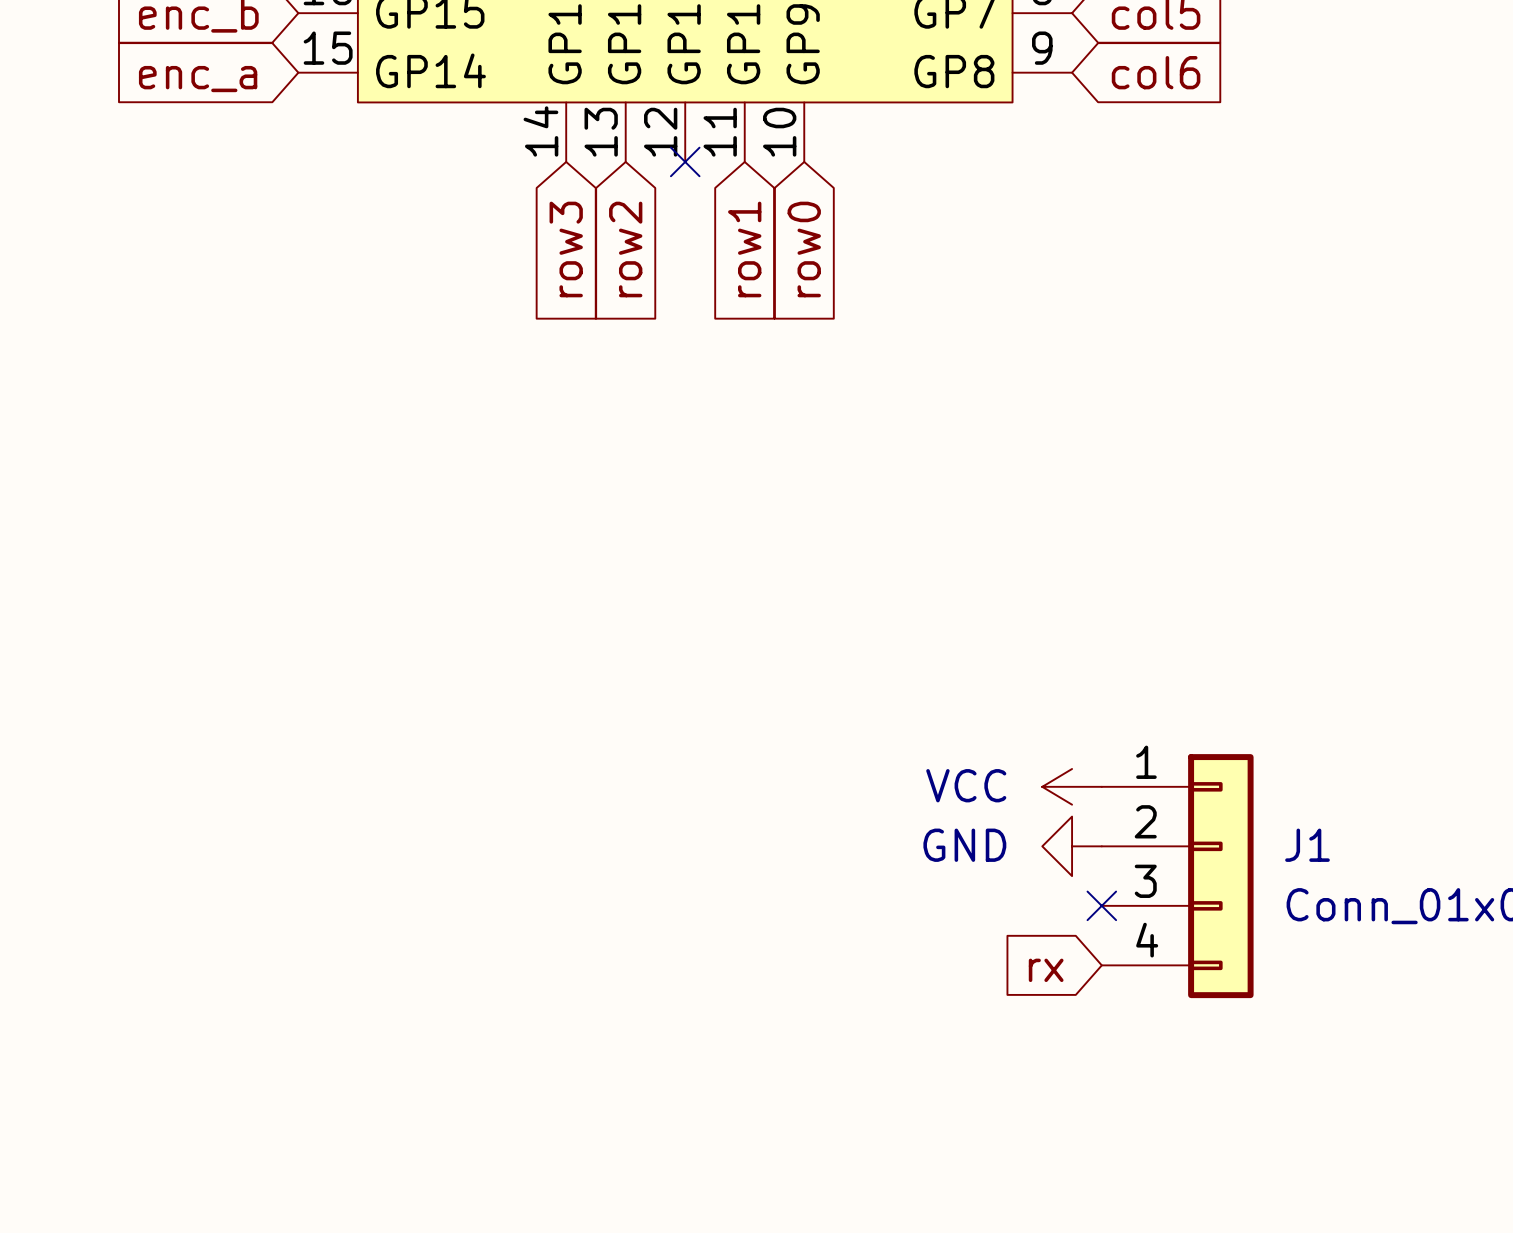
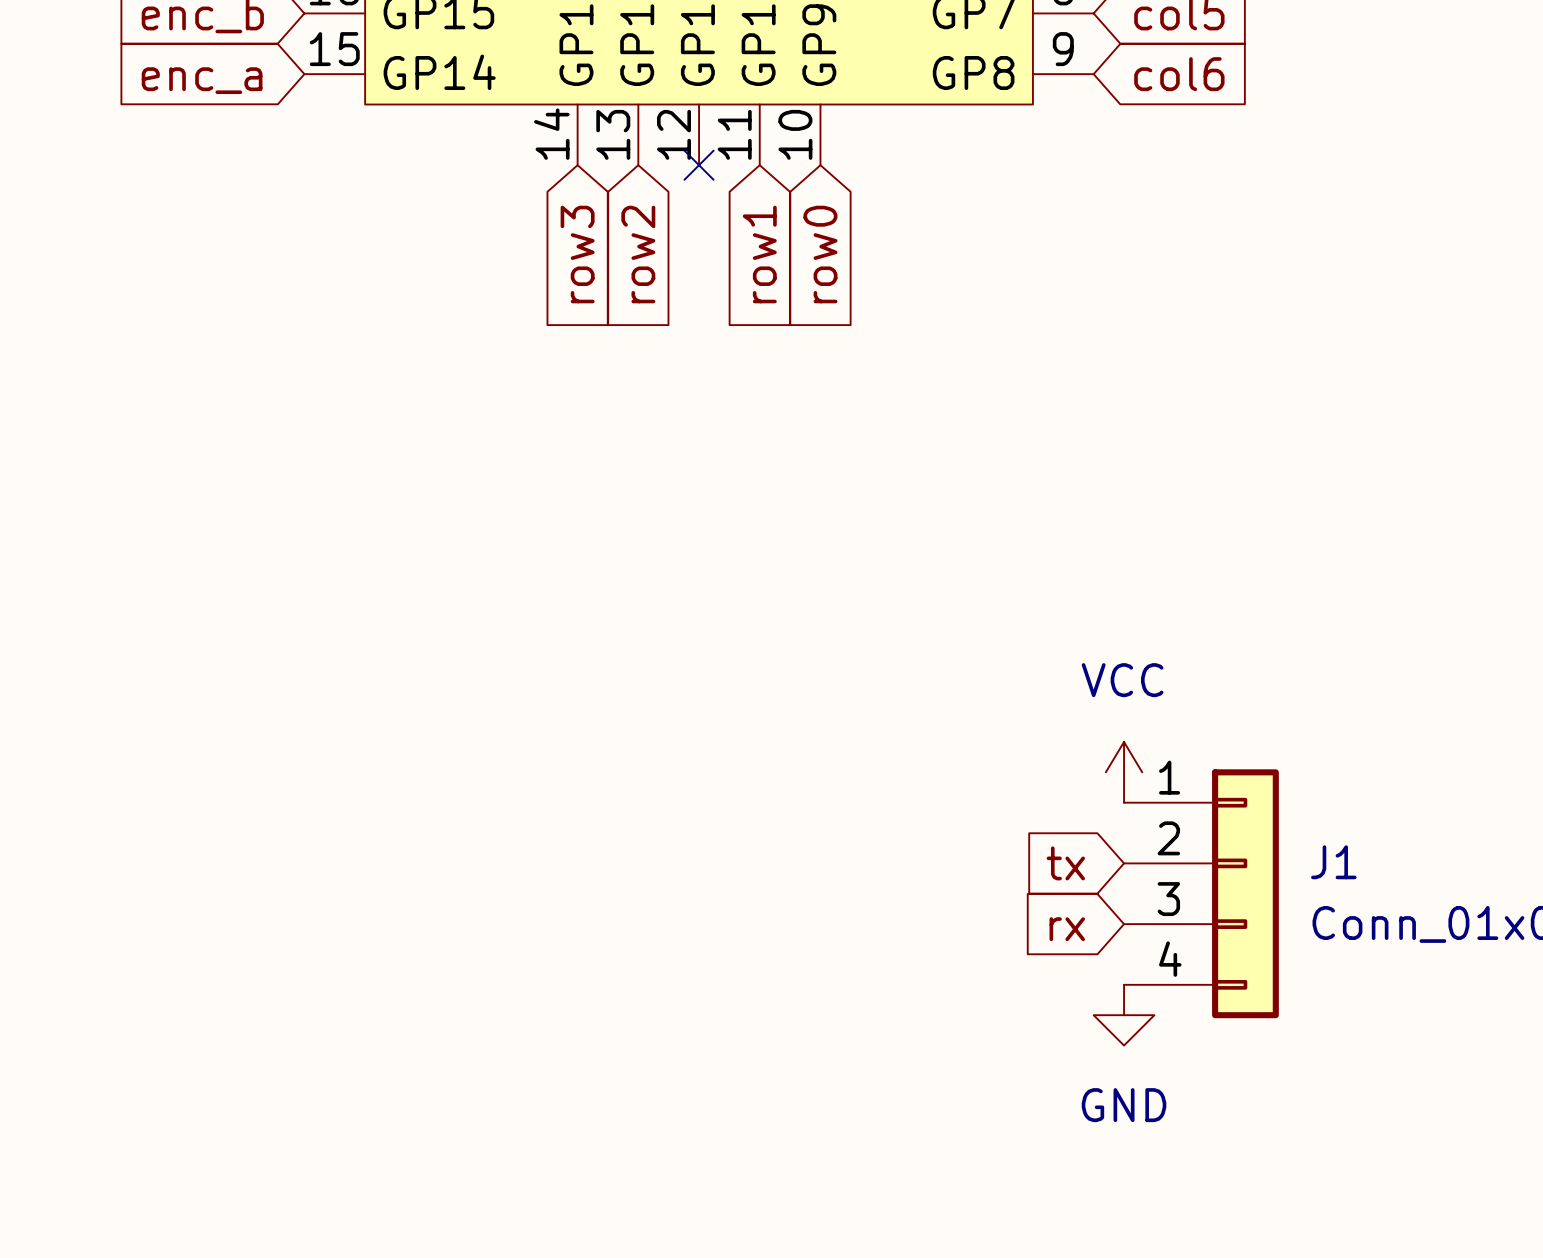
power symbol rotation: 0° (1072, 786) -> 90° clockwise (1124, 772)
power symbol position: VCC (1072, 786) -> VCC (1124, 772)
global label: none -> tx (1065, 863)
power symbol rotation: 0° (1072, 846) -> 90° counterclockwise (1124, 1015)
power symbol position: GND (1072, 846) -> GND (1124, 1015)
no-connect mark: (1101, 905) -> none
global label position: rx (1046, 970) -> rx (1067, 929)

